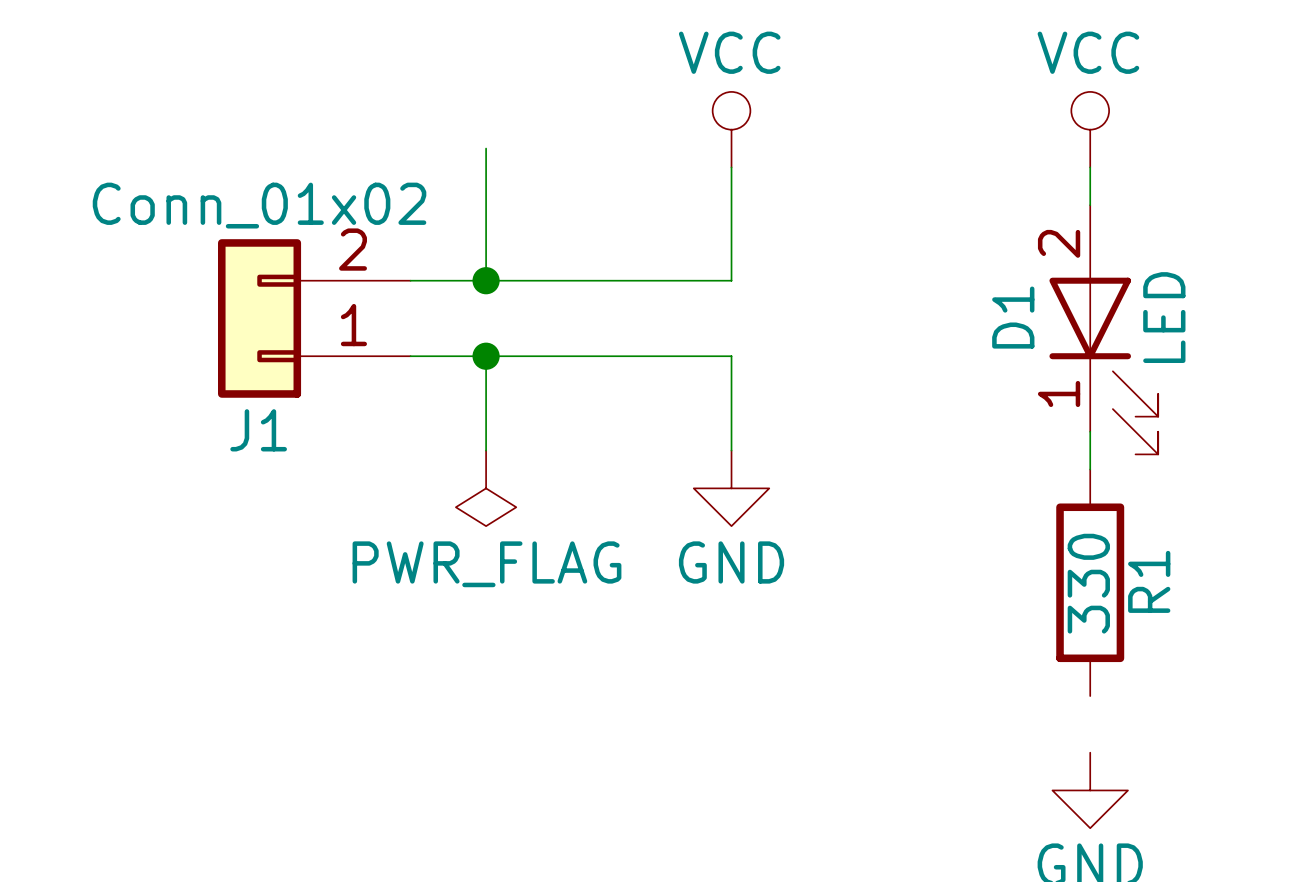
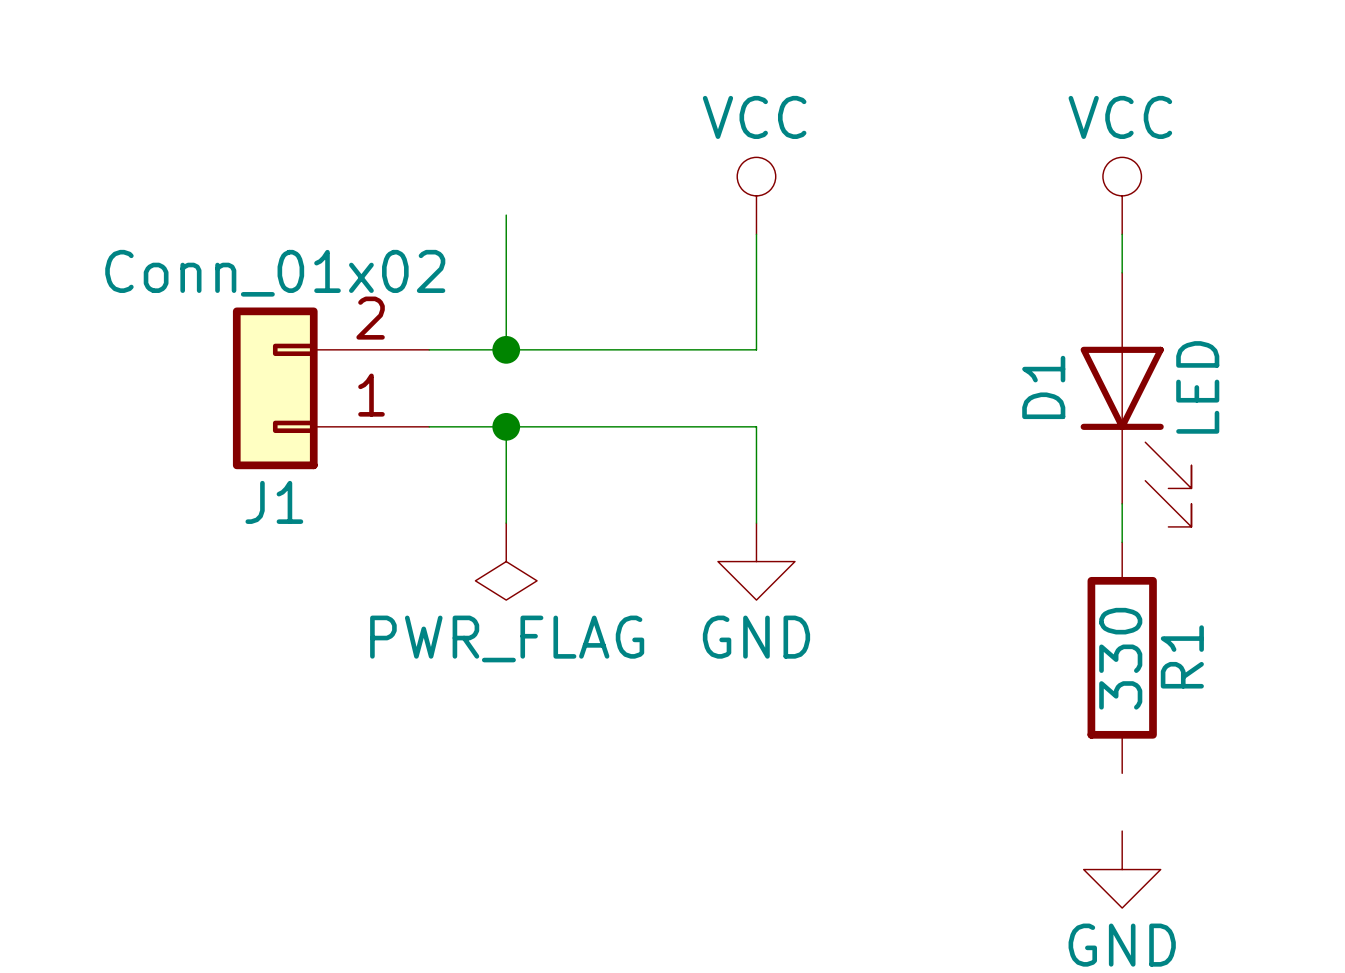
D1 pin number: 2 (1059, 243) -> none
D1 pin number: 1 (1059, 393) -> none

